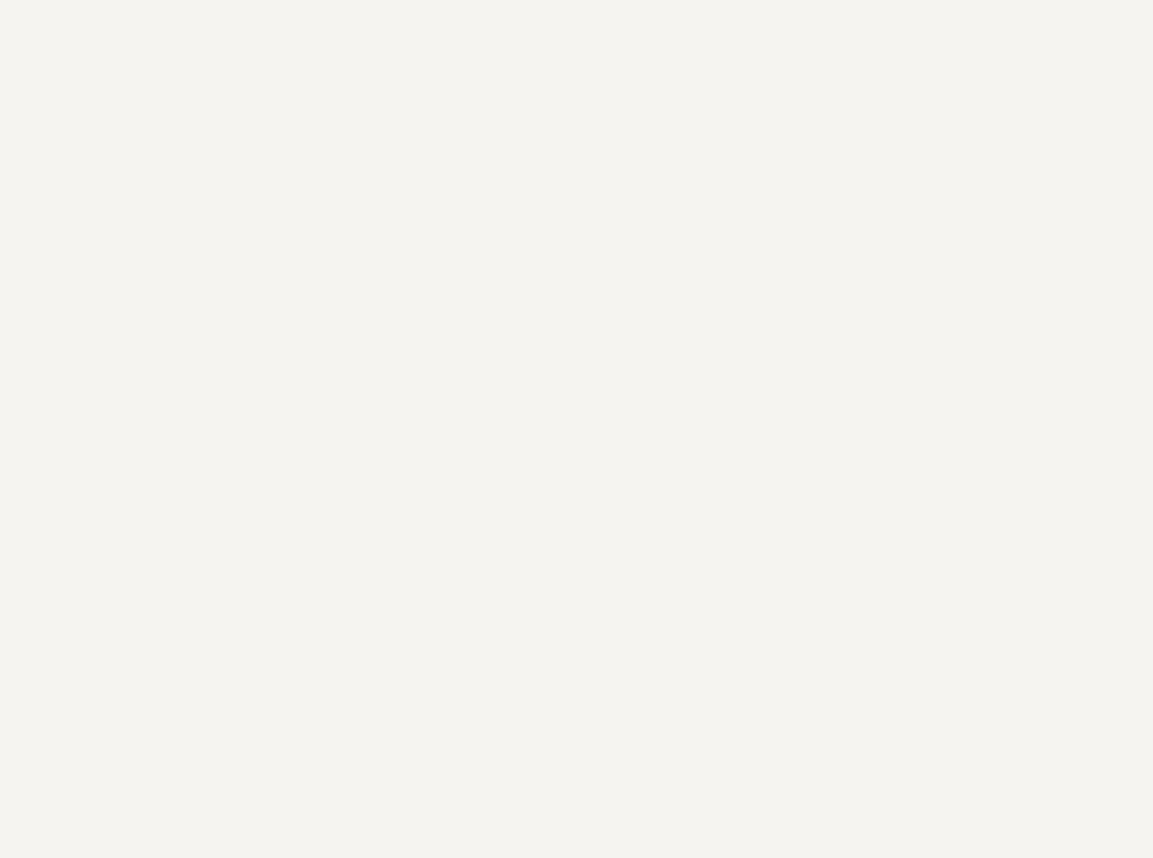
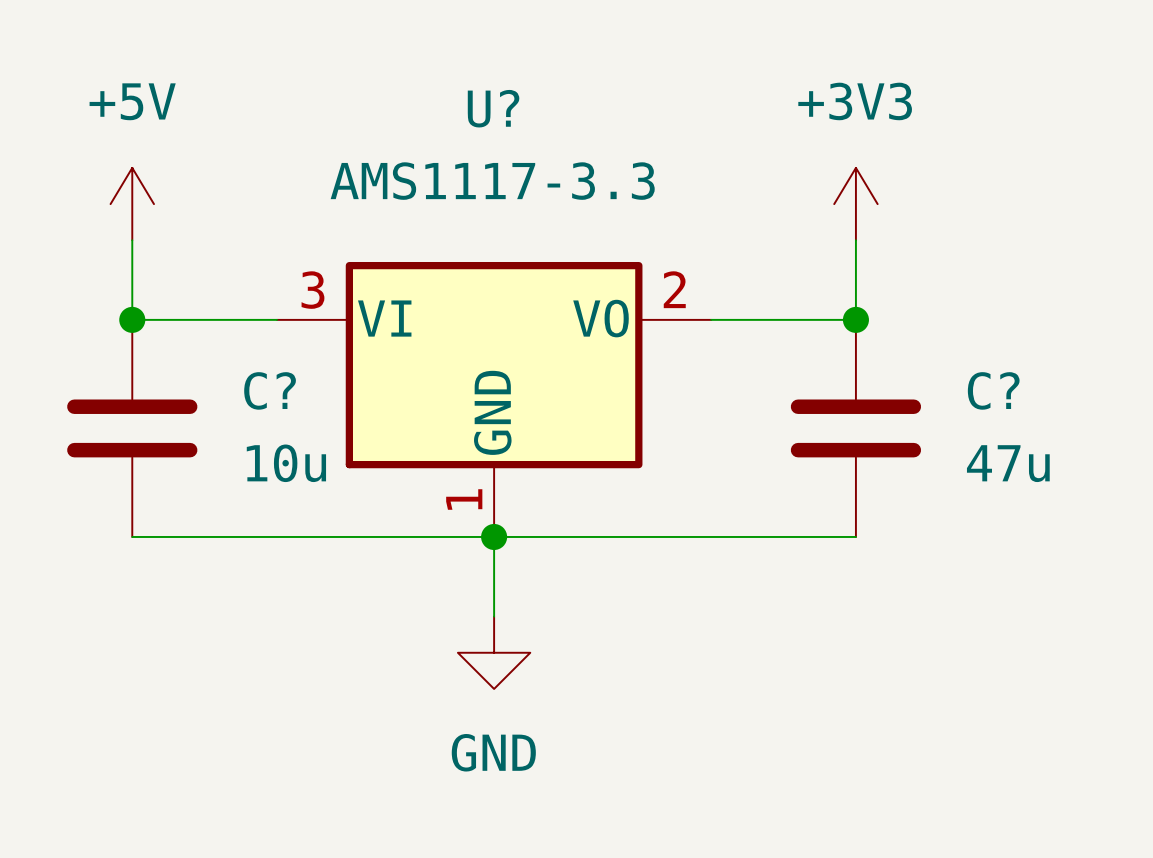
power symbol: none -> +5V (132, 204)
power symbol: none -> +3V3 (855, 204)
wire: none -> (132, 240) (132, 319) (277, 319)
wire: none -> (855, 240) (855, 319) (711, 319)
junction: none -> (132, 319)
junction: none -> (855, 319)
U?: none -> AMS1117-3.3 (494, 399)
C?: none -> 10u (132, 428)
C?: none -> 47u (855, 428)
wire: none -> (132, 536) (855, 536)
wire: none -> (494, 536) (494, 616)
junction: none -> (494, 536)
power symbol: none -> GND (494, 652)

